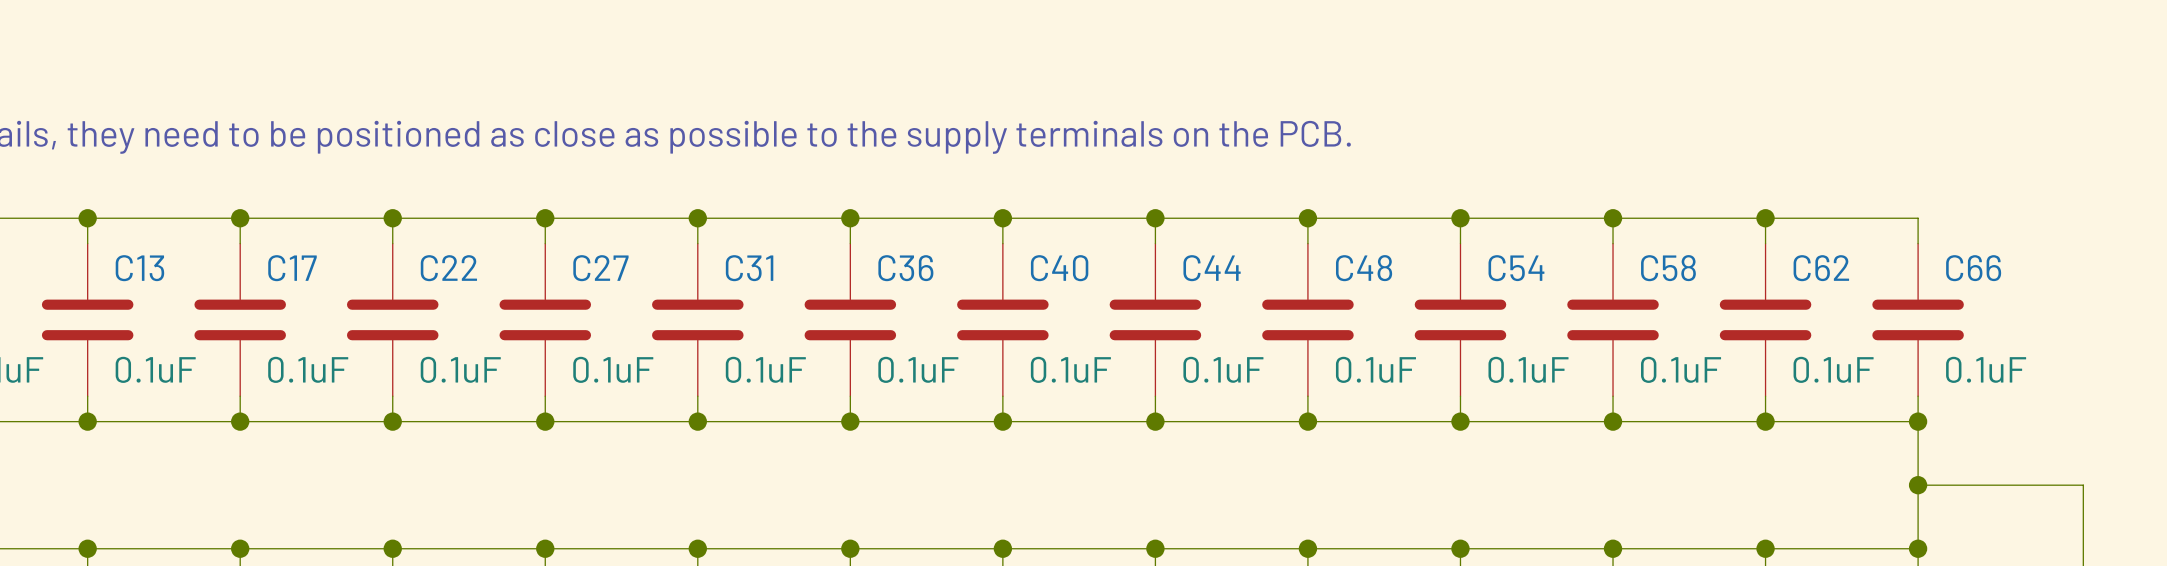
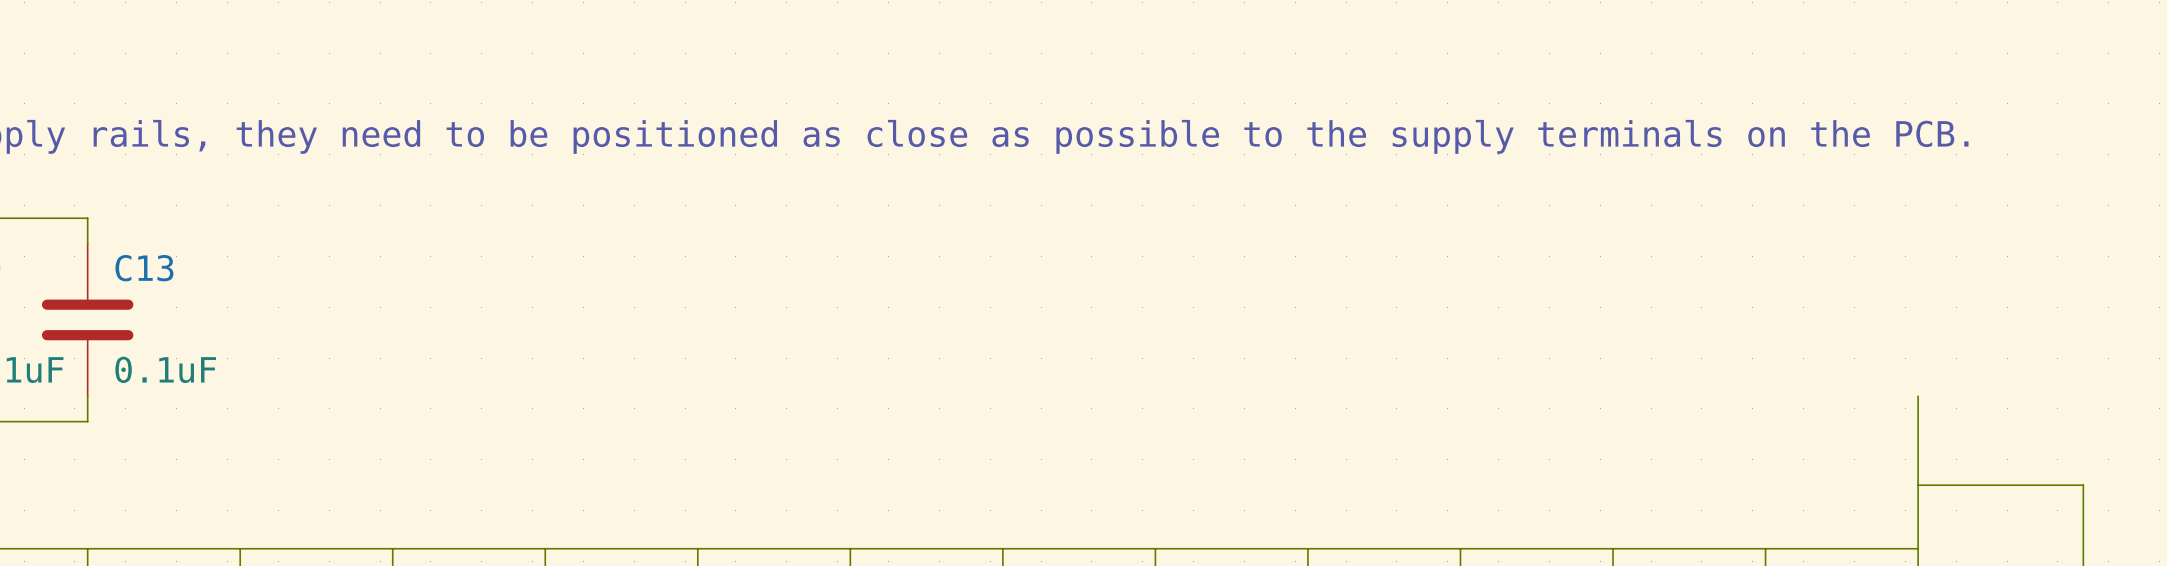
wire: (87, 218) (1918, 218) (1918, 243) -> none
junction: (87, 218) -> none
wire: (240, 218) (240, 243) -> none
junction: (240, 218) -> none
wire: (392, 218) (392, 243) -> none
junction: (392, 218) -> none
wire: (545, 218) (545, 243) -> none
junction: (545, 218) -> none
wire: (697, 218) (697, 243) -> none
junction: (697, 218) -> none
wire: (850, 218) (850, 243) -> none
junction: (850, 218) -> none
wire: (1002, 218) (1002, 243) -> none
junction: (1002, 218) -> none
wire: (1155, 218) (1155, 243) -> none
junction: (1155, 218) -> none
wire: (1307, 218) (1307, 243) -> none
junction: (1307, 218) -> none
wire: (1460, 218) (1460, 243) -> none
junction: (1460, 218) -> none
wire: (1613, 218) (1613, 243) -> none
junction: (1613, 218) -> none
wire: (1765, 218) (1765, 243) -> none
junction: (1765, 218) -> none
C17: 0.1uF (240, 319) -> none
C22: 0.1uF (392, 319) -> none
C27: 0.1uF (545, 319) -> none
C31: 0.1uF (697, 319) -> none
C36: 0.1uF (850, 319) -> none
C40: 0.1uF (1002, 319) -> none
C44: 0.1uF (1155, 319) -> none
C48: 0.1uF (1307, 319) -> none
C54: 0.1uF (1460, 319) -> none
C58: 0.1uF (1613, 319) -> none
C62: 0.1uF (1765, 319) -> none
C66: 0.1uF (1918, 319) -> none
wire: (240, 396) (240, 421) -> none
wire: (392, 396) (392, 421) -> none
wire: (545, 396) (545, 421) -> none
wire: (697, 396) (697, 421) -> none
wire: (850, 396) (850, 421) -> none
wire: (1002, 396) (1002, 421) -> none
wire: (1155, 396) (1155, 421) -> none
wire: (1307, 396) (1307, 421) -> none
wire: (1460, 396) (1460, 421) -> none
wire: (1613, 396) (1613, 421) -> none
wire: (1765, 396) (1765, 421) -> none
wire: (87, 421) (1918, 421) -> none
junction: (87, 421) -> none
junction: (240, 421) -> none
junction: (392, 421) -> none
junction: (545, 421) -> none
junction: (697, 421) -> none
junction: (850, 421) -> none
junction: (1002, 421) -> none
junction: (1155, 421) -> none
junction: (1307, 421) -> none
junction: (1460, 421) -> none
junction: (1613, 421) -> none
junction: (1765, 421) -> none
junction: (1918, 421) -> none
junction: (1918, 485) -> none
junction: (87, 548) -> none
junction: (240, 548) -> none
junction: (392, 548) -> none
junction: (545, 548) -> none
junction: (697, 548) -> none
junction: (850, 548) -> none
junction: (1002, 548) -> none
junction: (1155, 548) -> none
junction: (1307, 548) -> none
junction: (1460, 548) -> none
junction: (1613, 548) -> none
junction: (1765, 548) -> none
junction: (1918, 548) -> none

